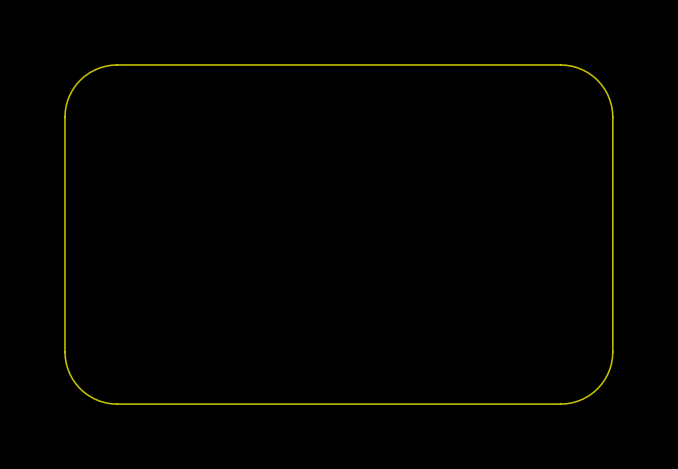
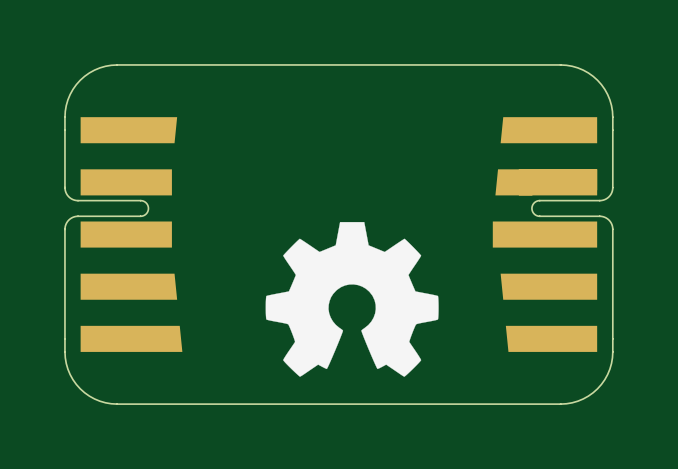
board edge: (64, 130) (64, 338) -> none
board edge: (612, 130) (612, 338) -> none
drawing: none -> [265, 222, 439, 377]
part: none -> (123, 234)
part: none -> (553, 234)

